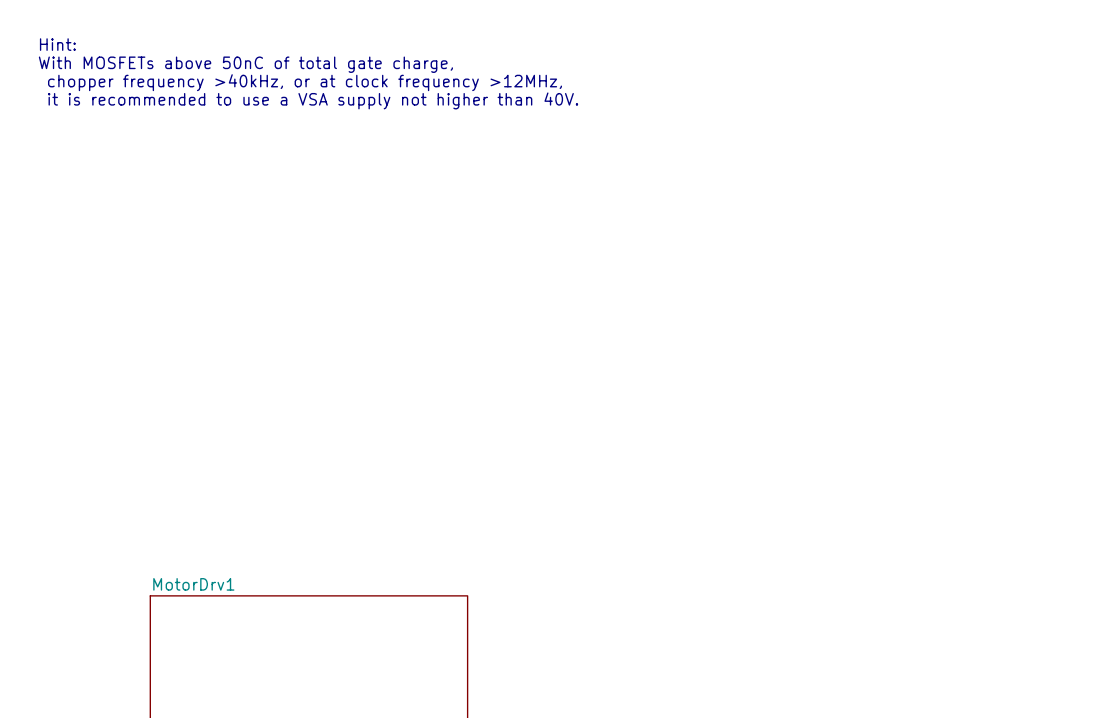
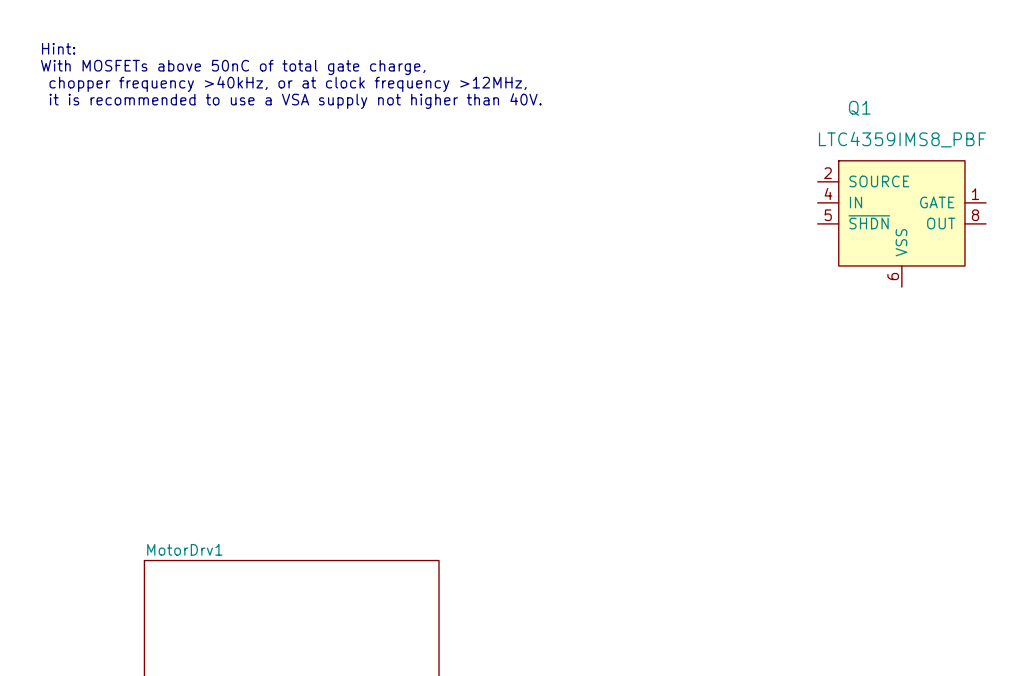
Q1: none -> LTC4359IMS8_PBF (901, 223)

